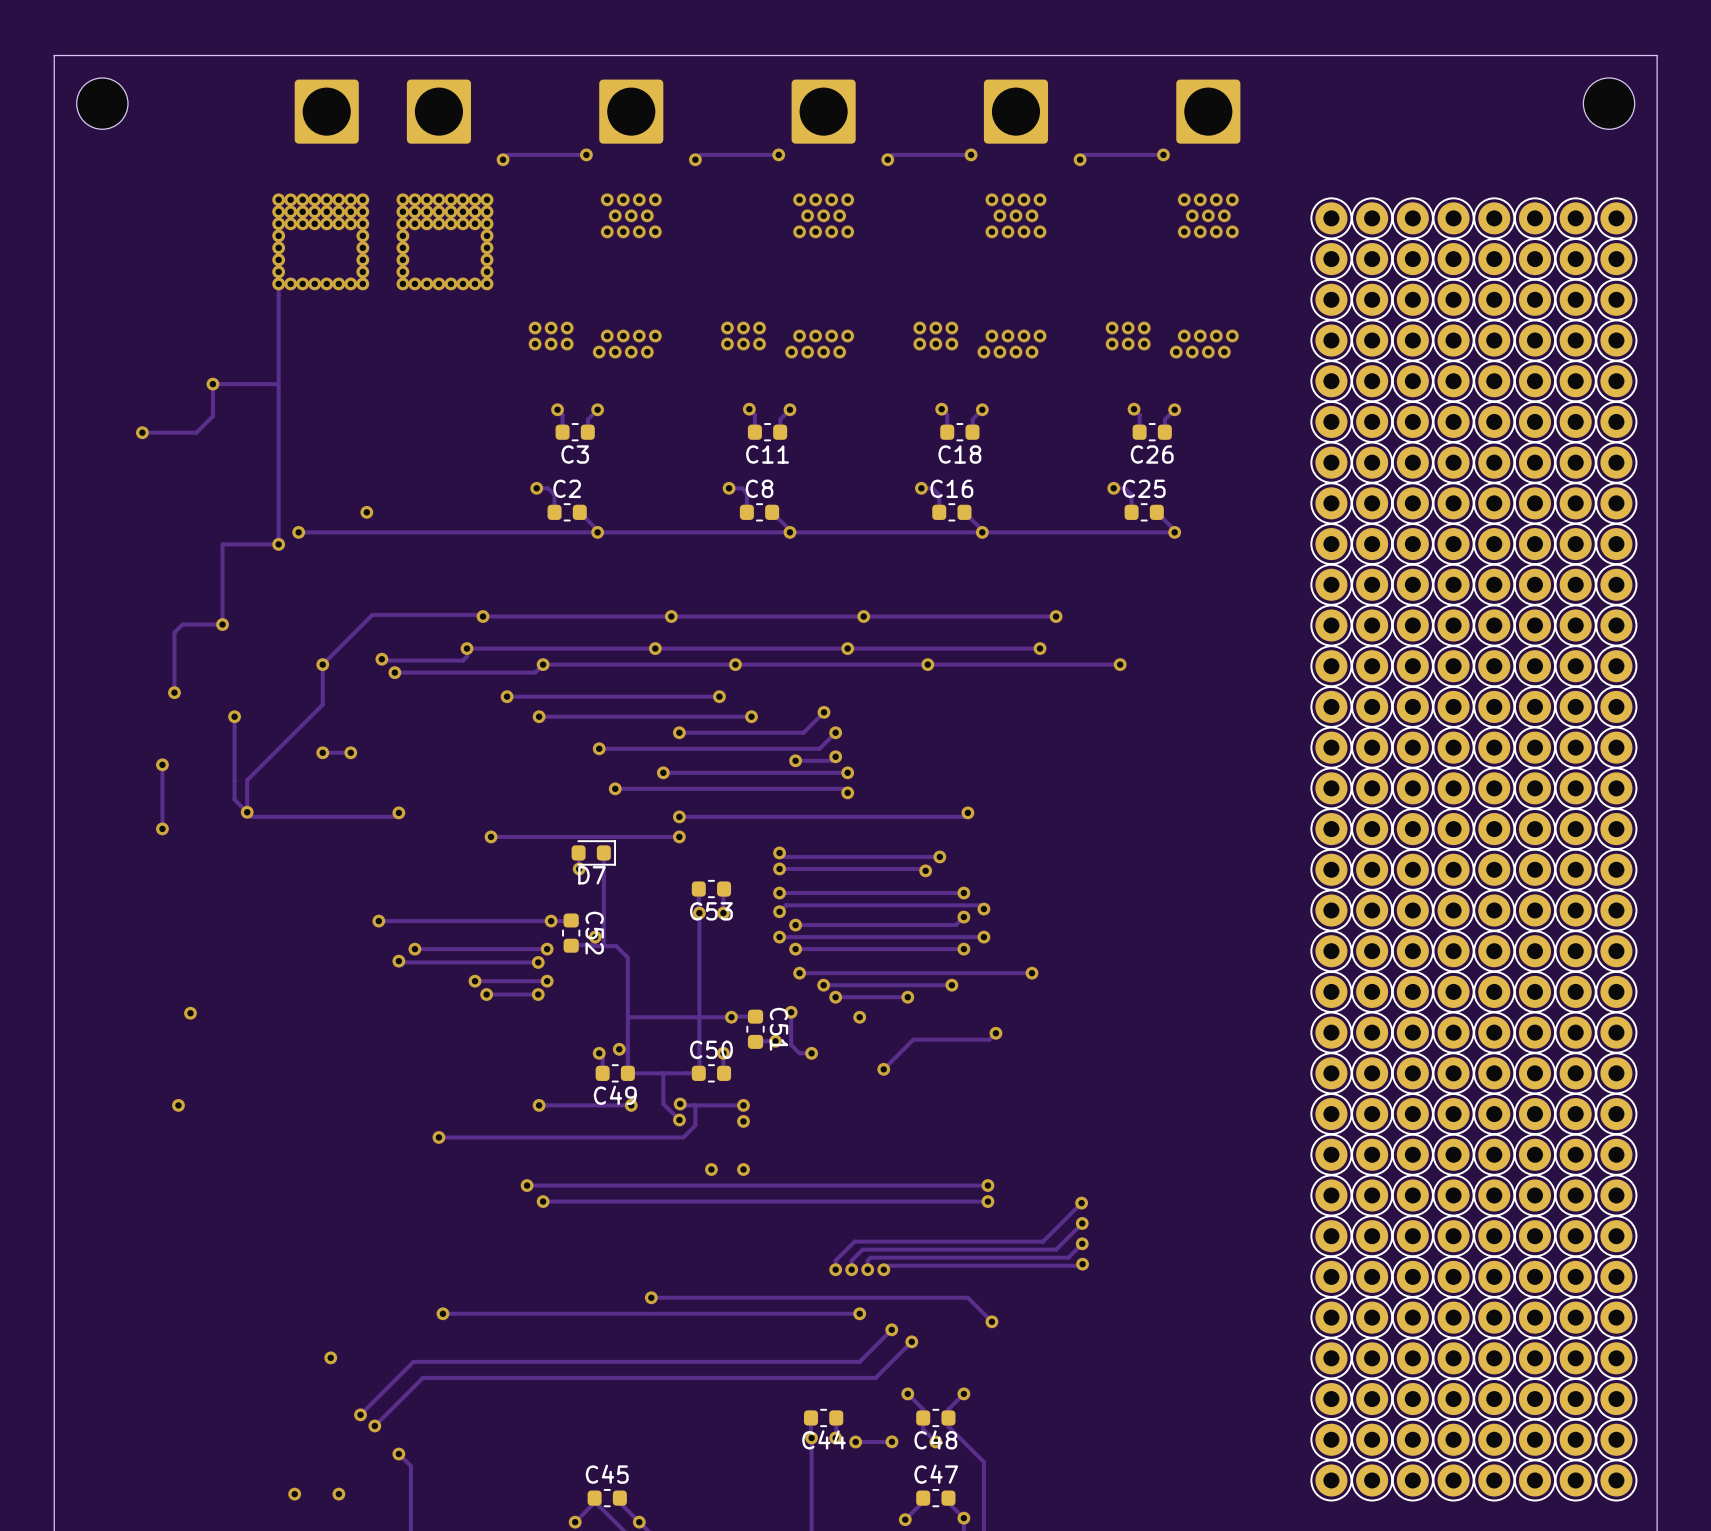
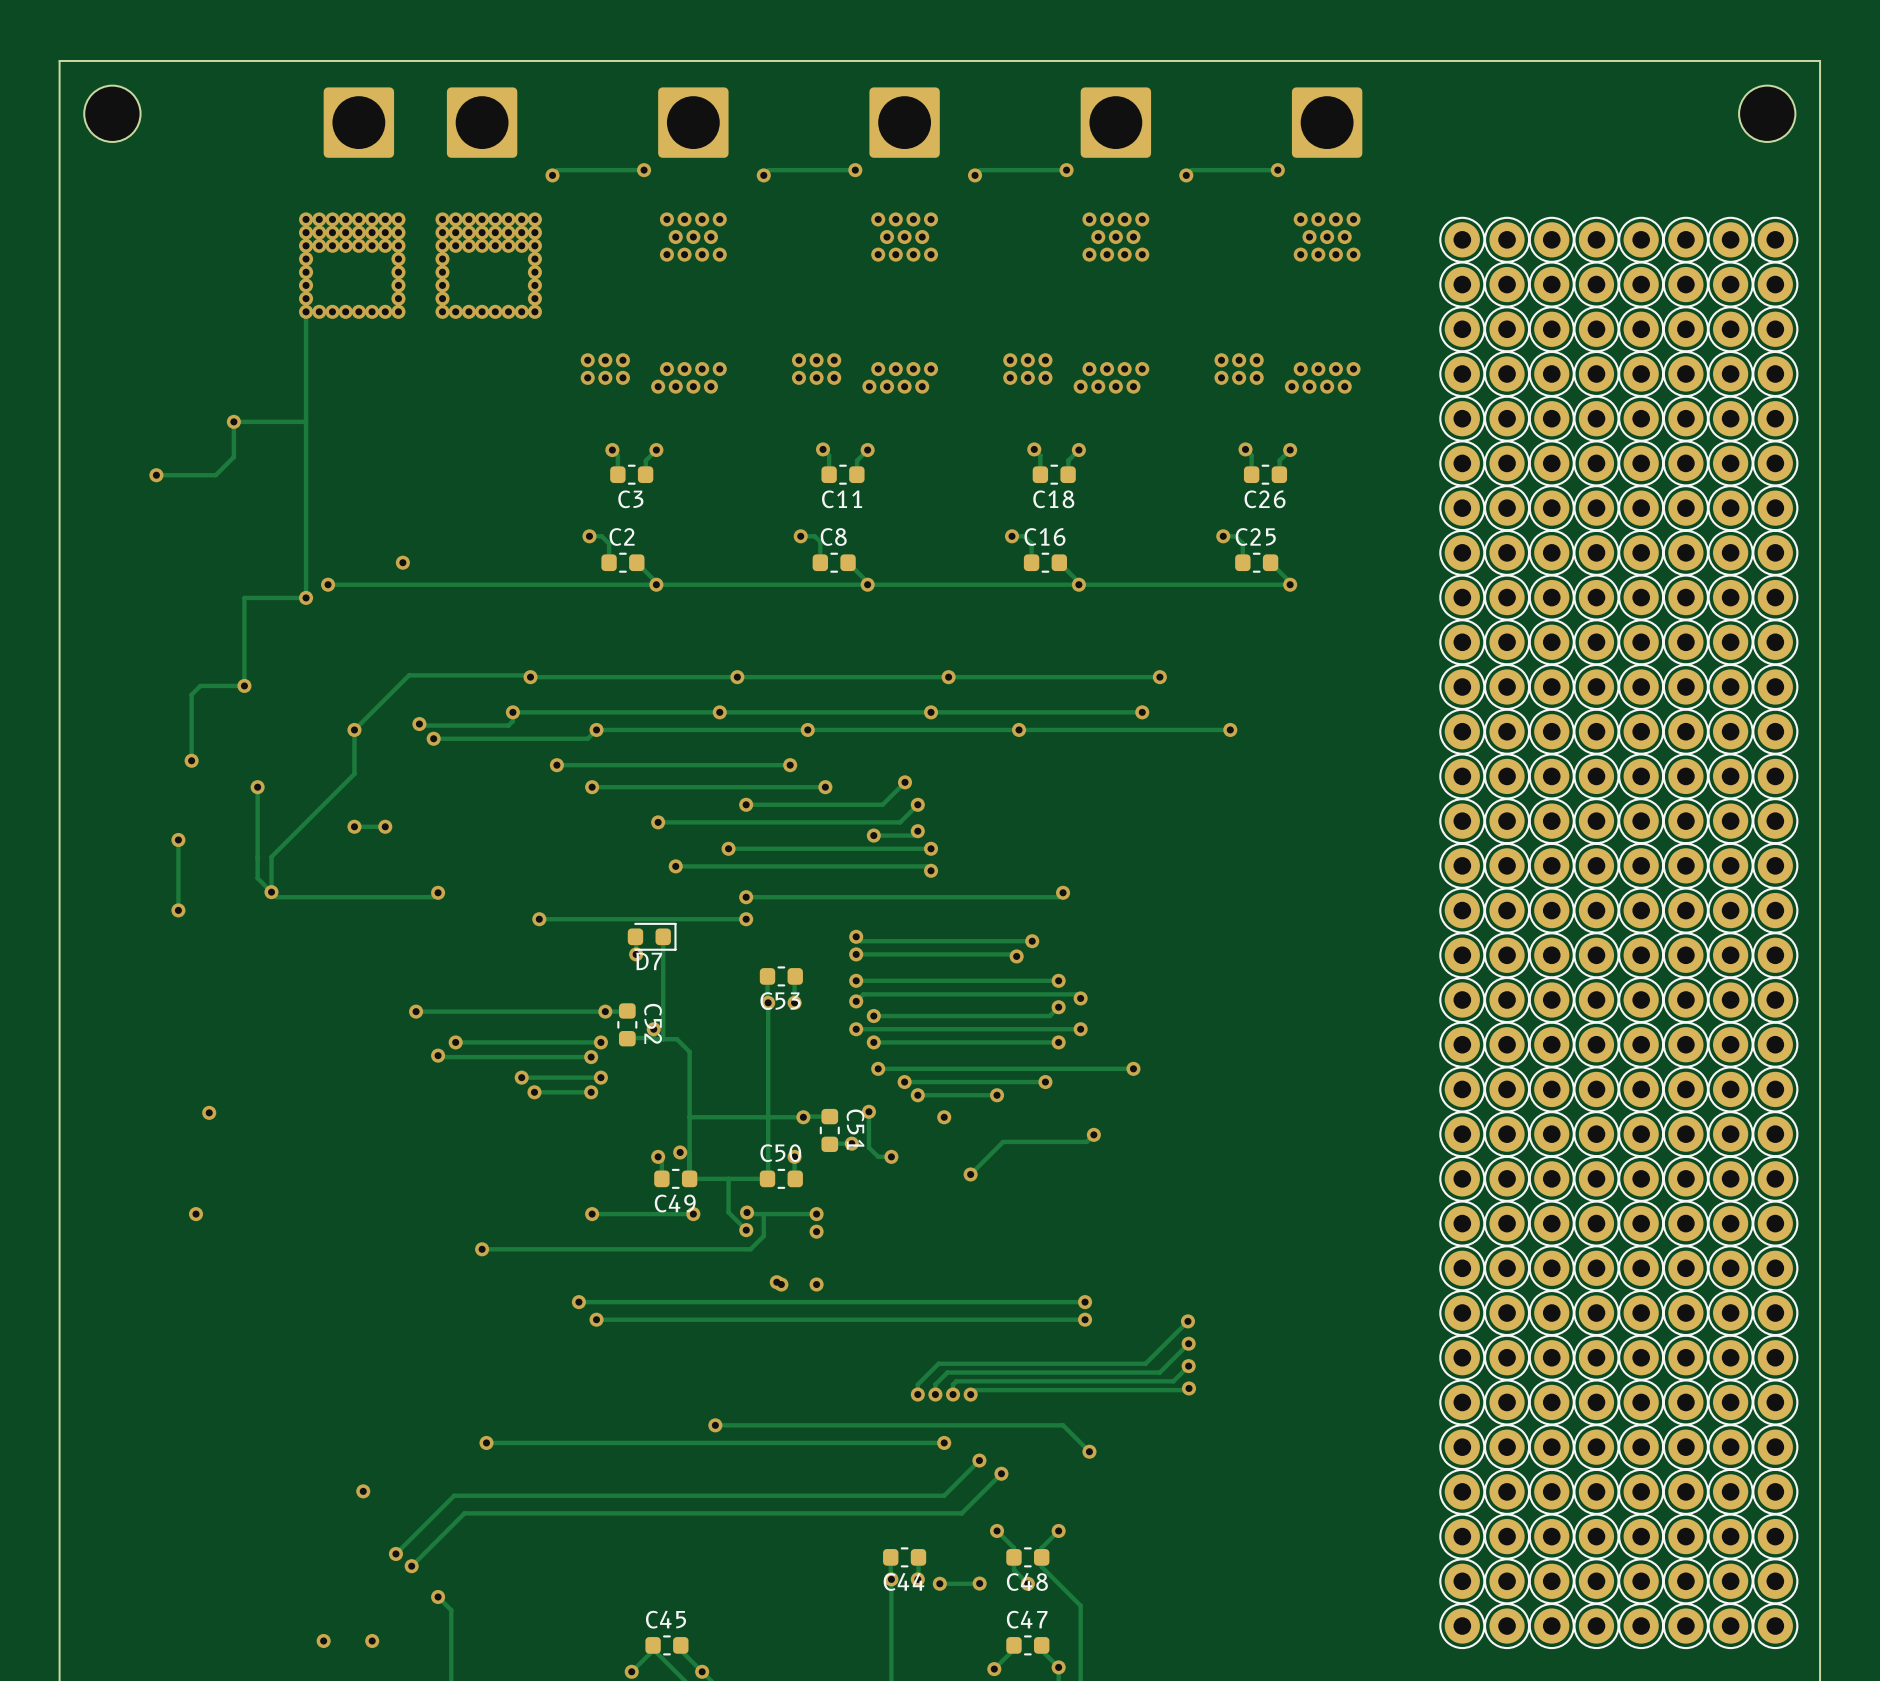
via: none -> (776, 1282)

